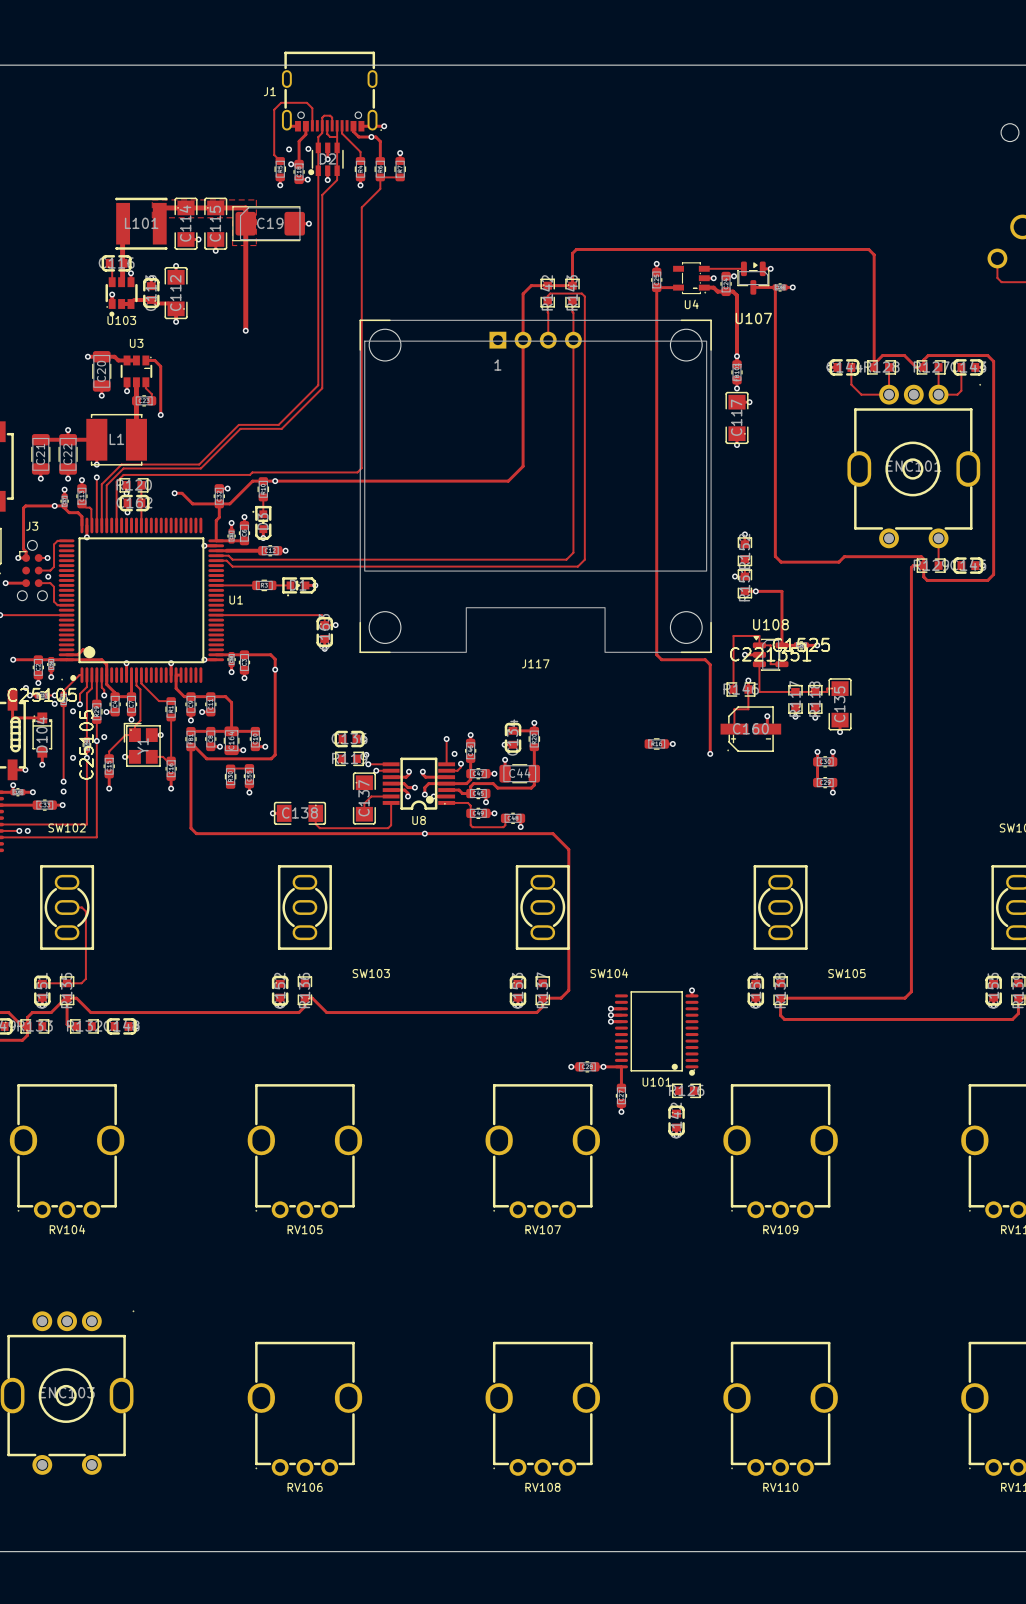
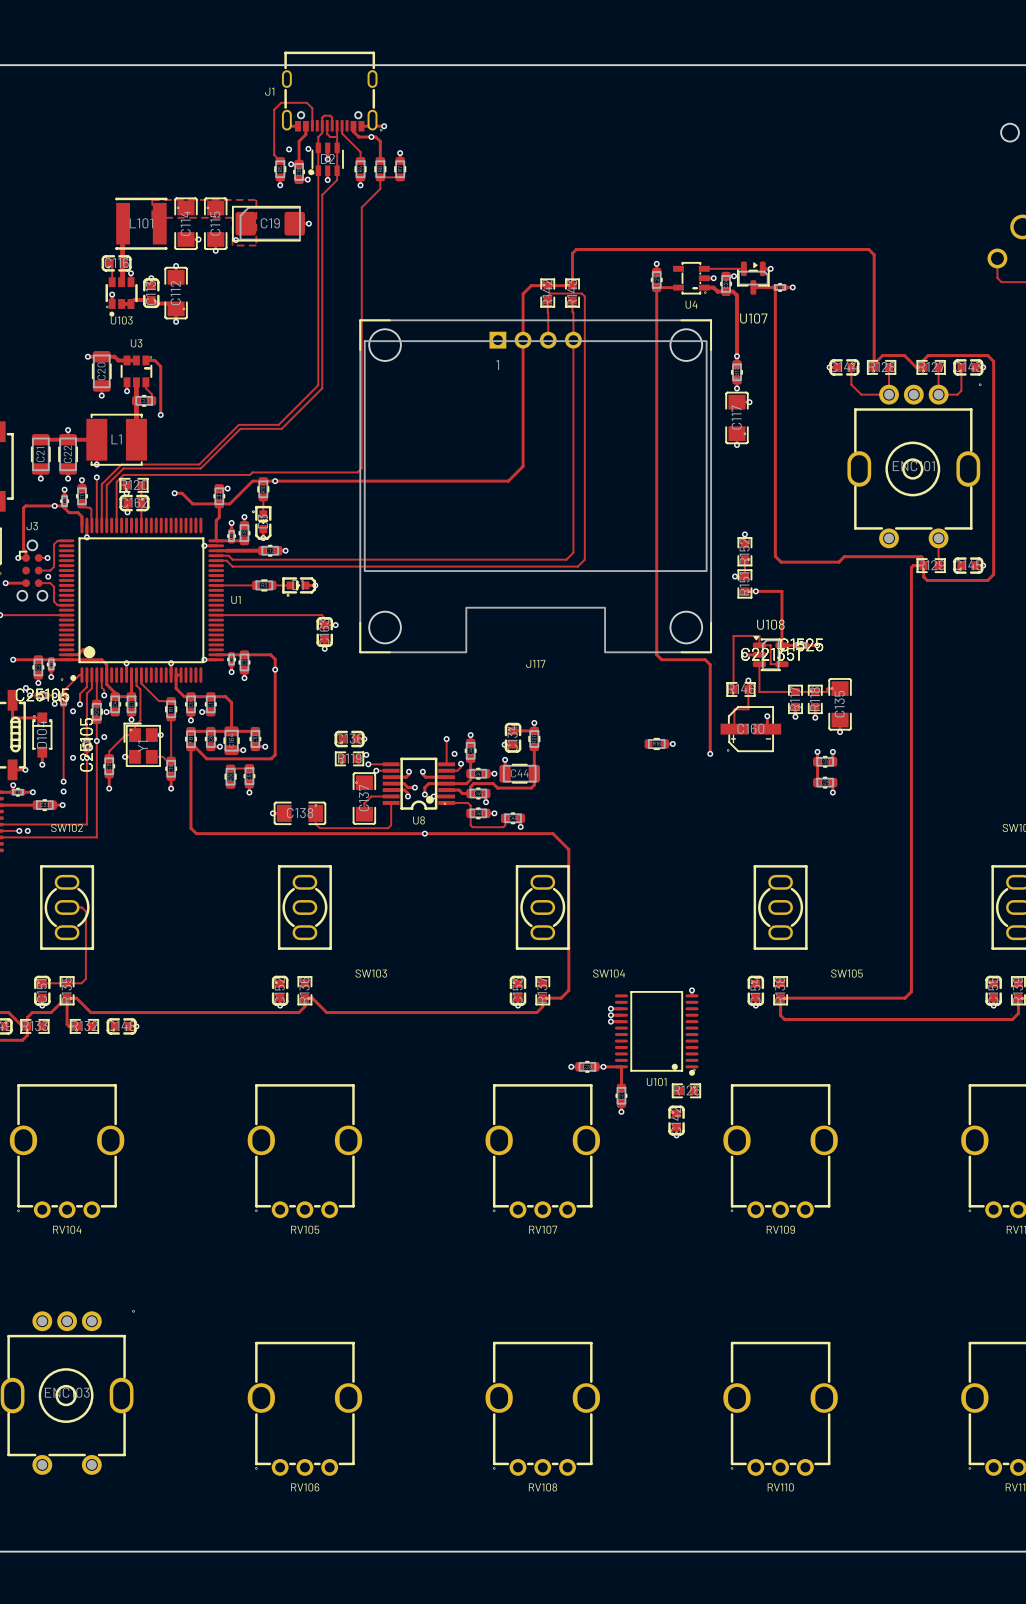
track: (159, 223) (159, 207) (245, 207) (245, 330) -> none
via: none -> (236, 240)
via: (245, 330) -> none

